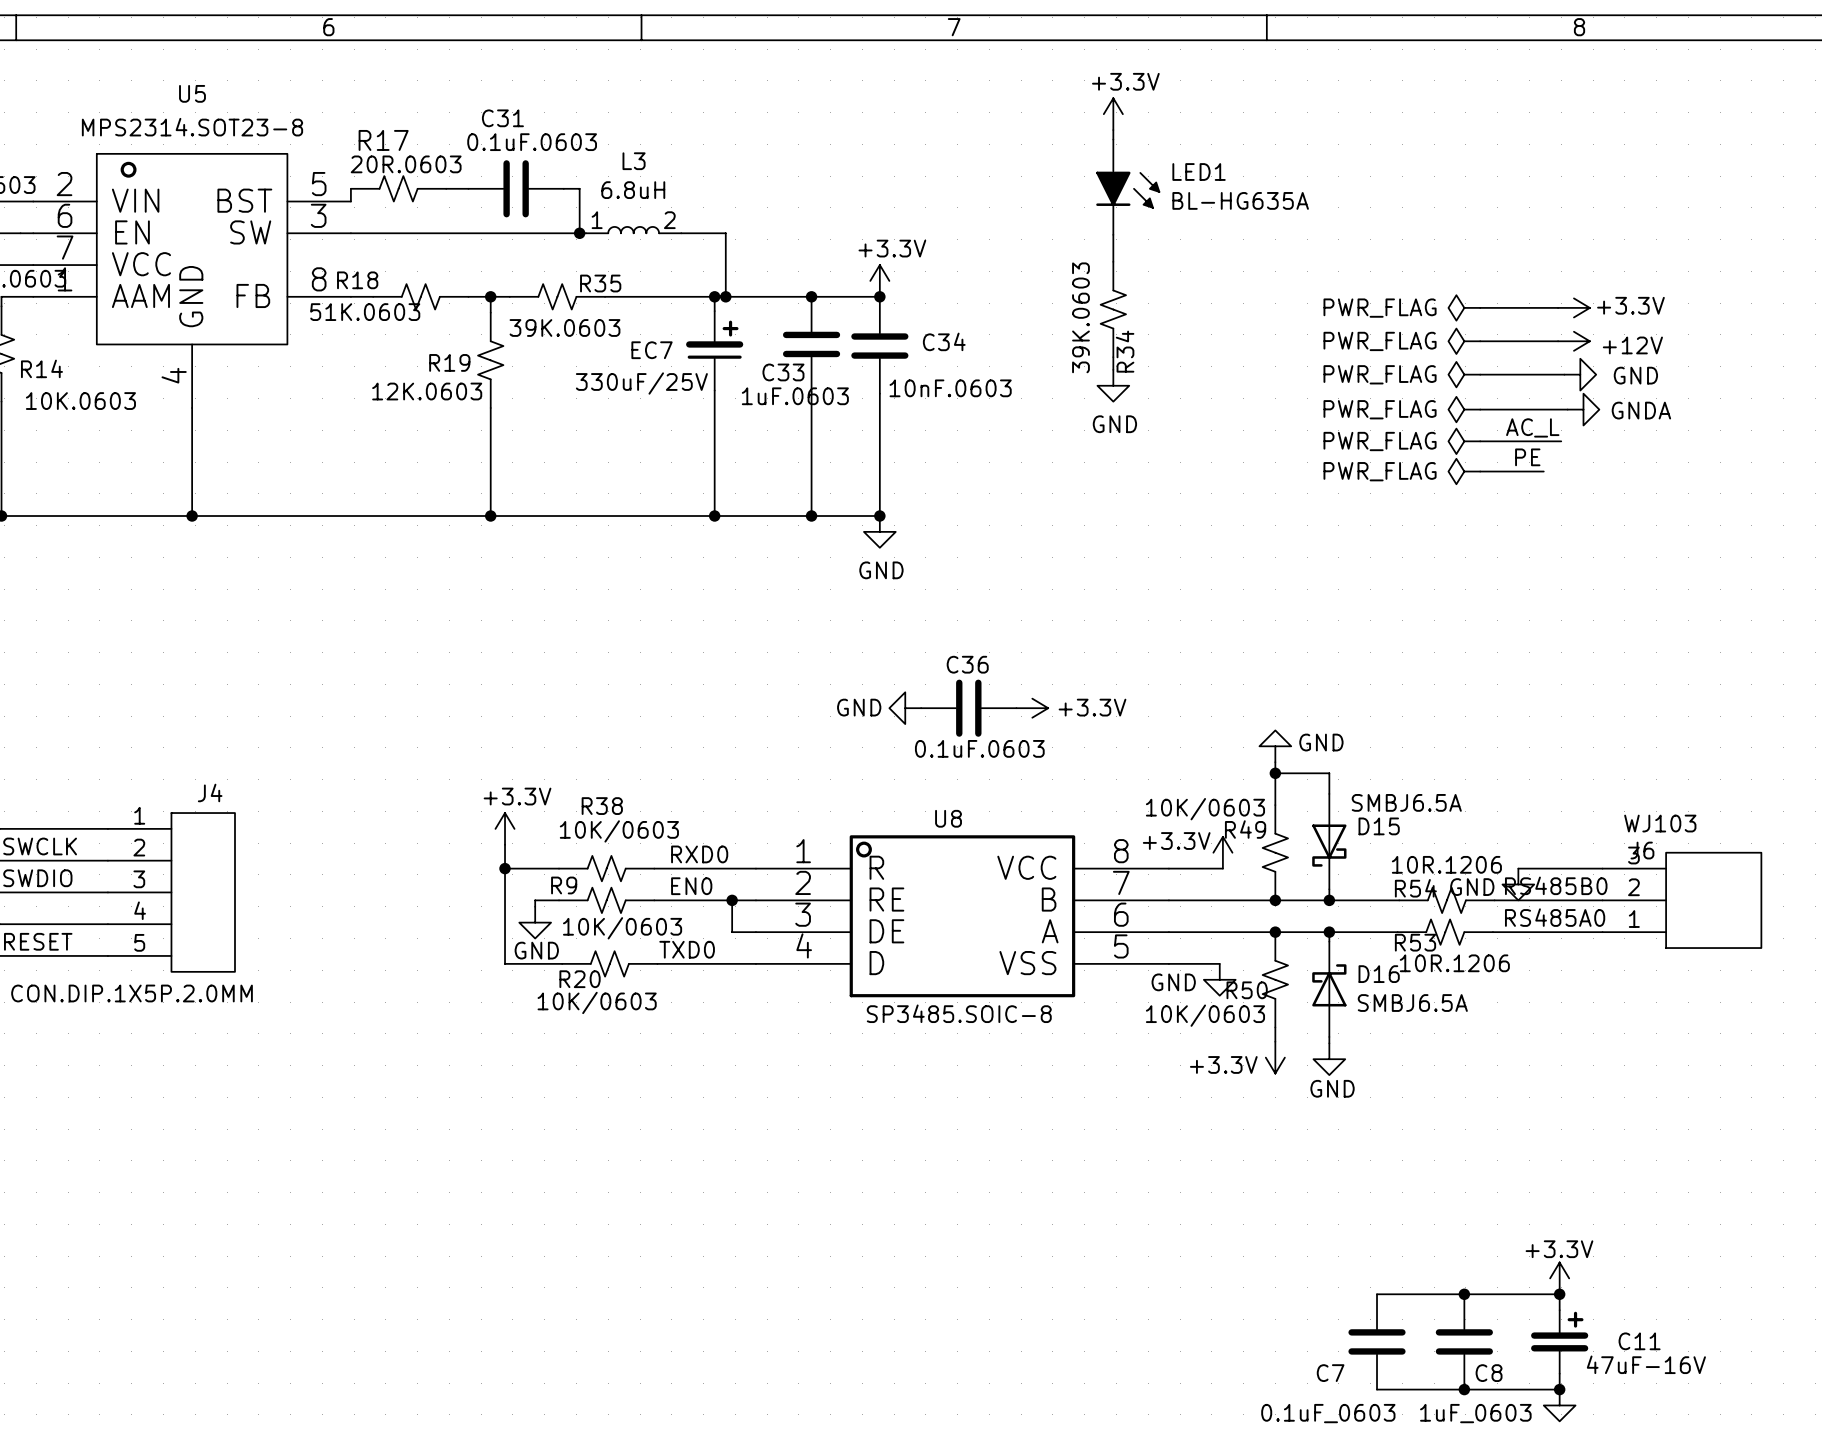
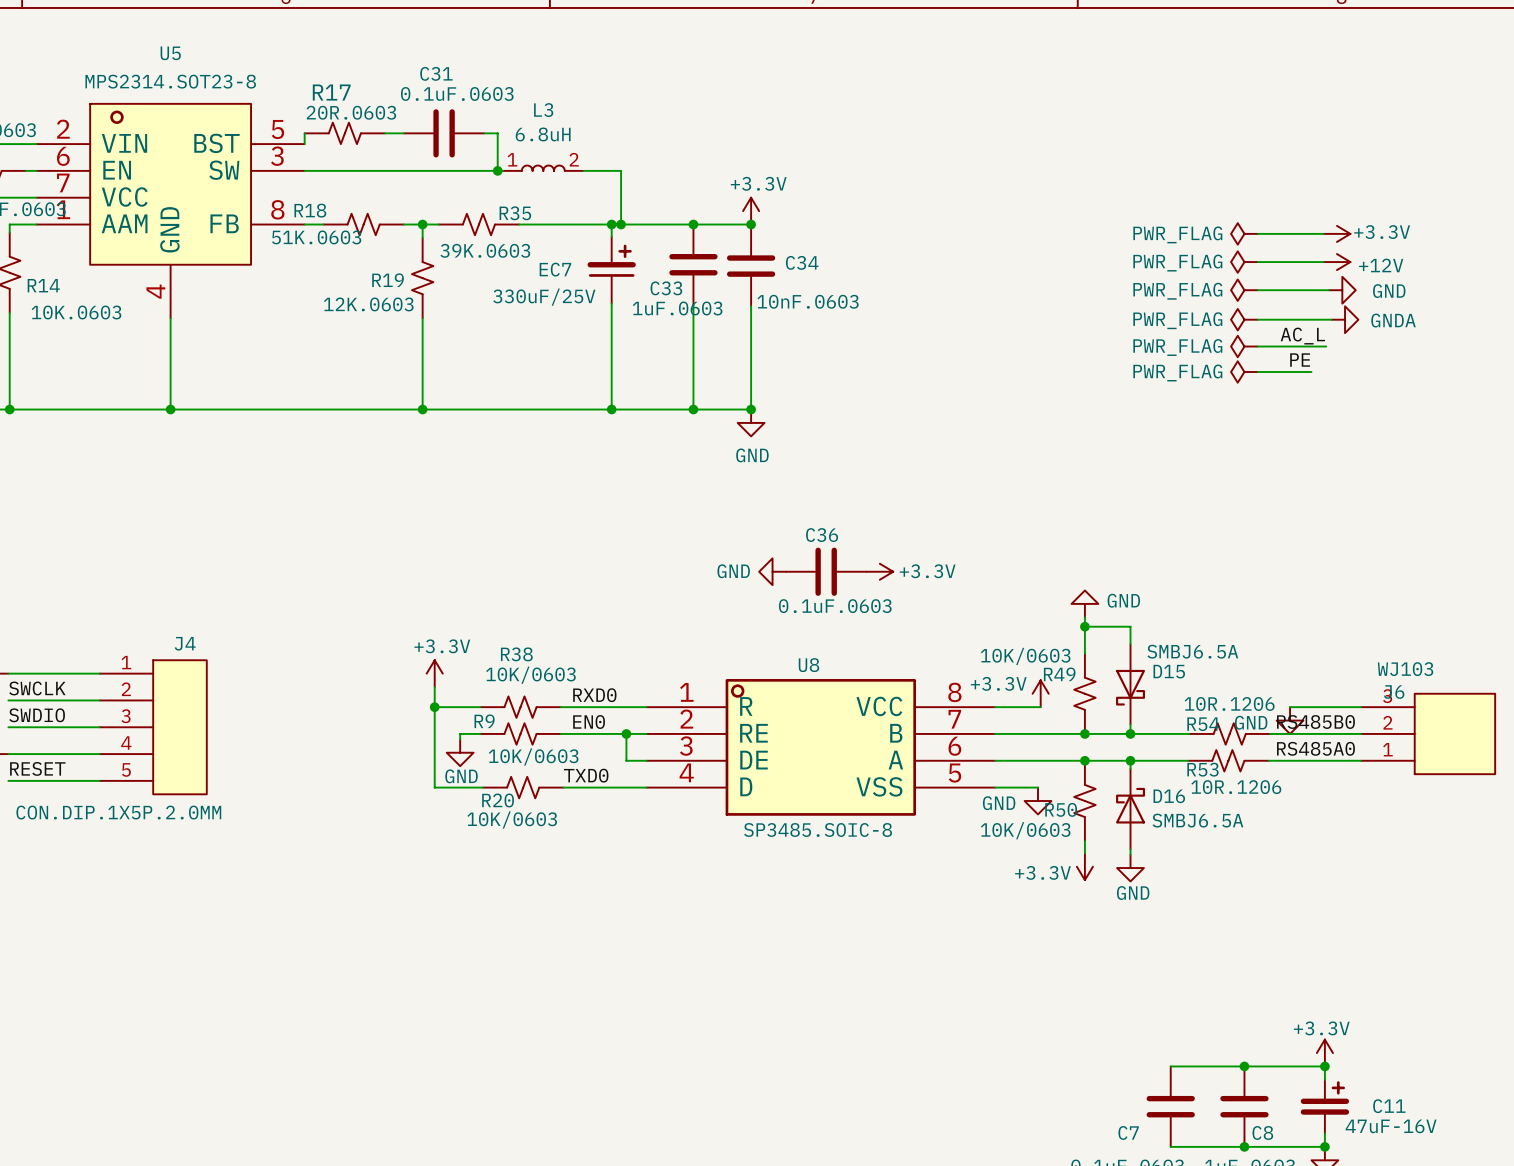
power symbol: +3.3V (1113, 114) -> none
wire: (1113, 130) (1113, 139) -> none
LED1: BL-HG635A (1127, 187) -> none
wire: (1113, 234) (1113, 261) -> none
R34: 39K.0603 (1113, 309) -> none
wire: (1113, 357) (1113, 369) -> none
power symbol: GND (1113, 385) -> none

